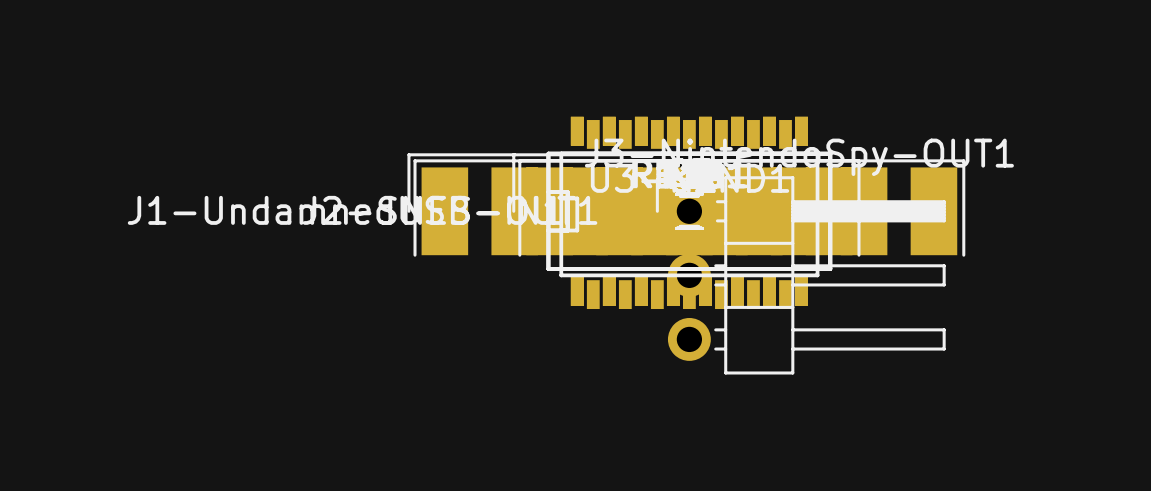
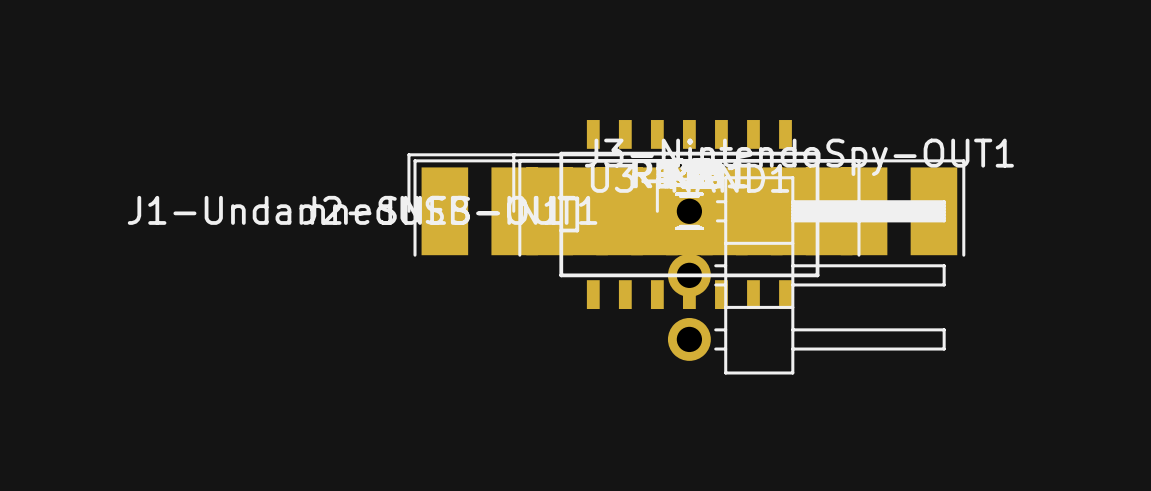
part: (689, 211) -> none
part: (689, 211) -> none

